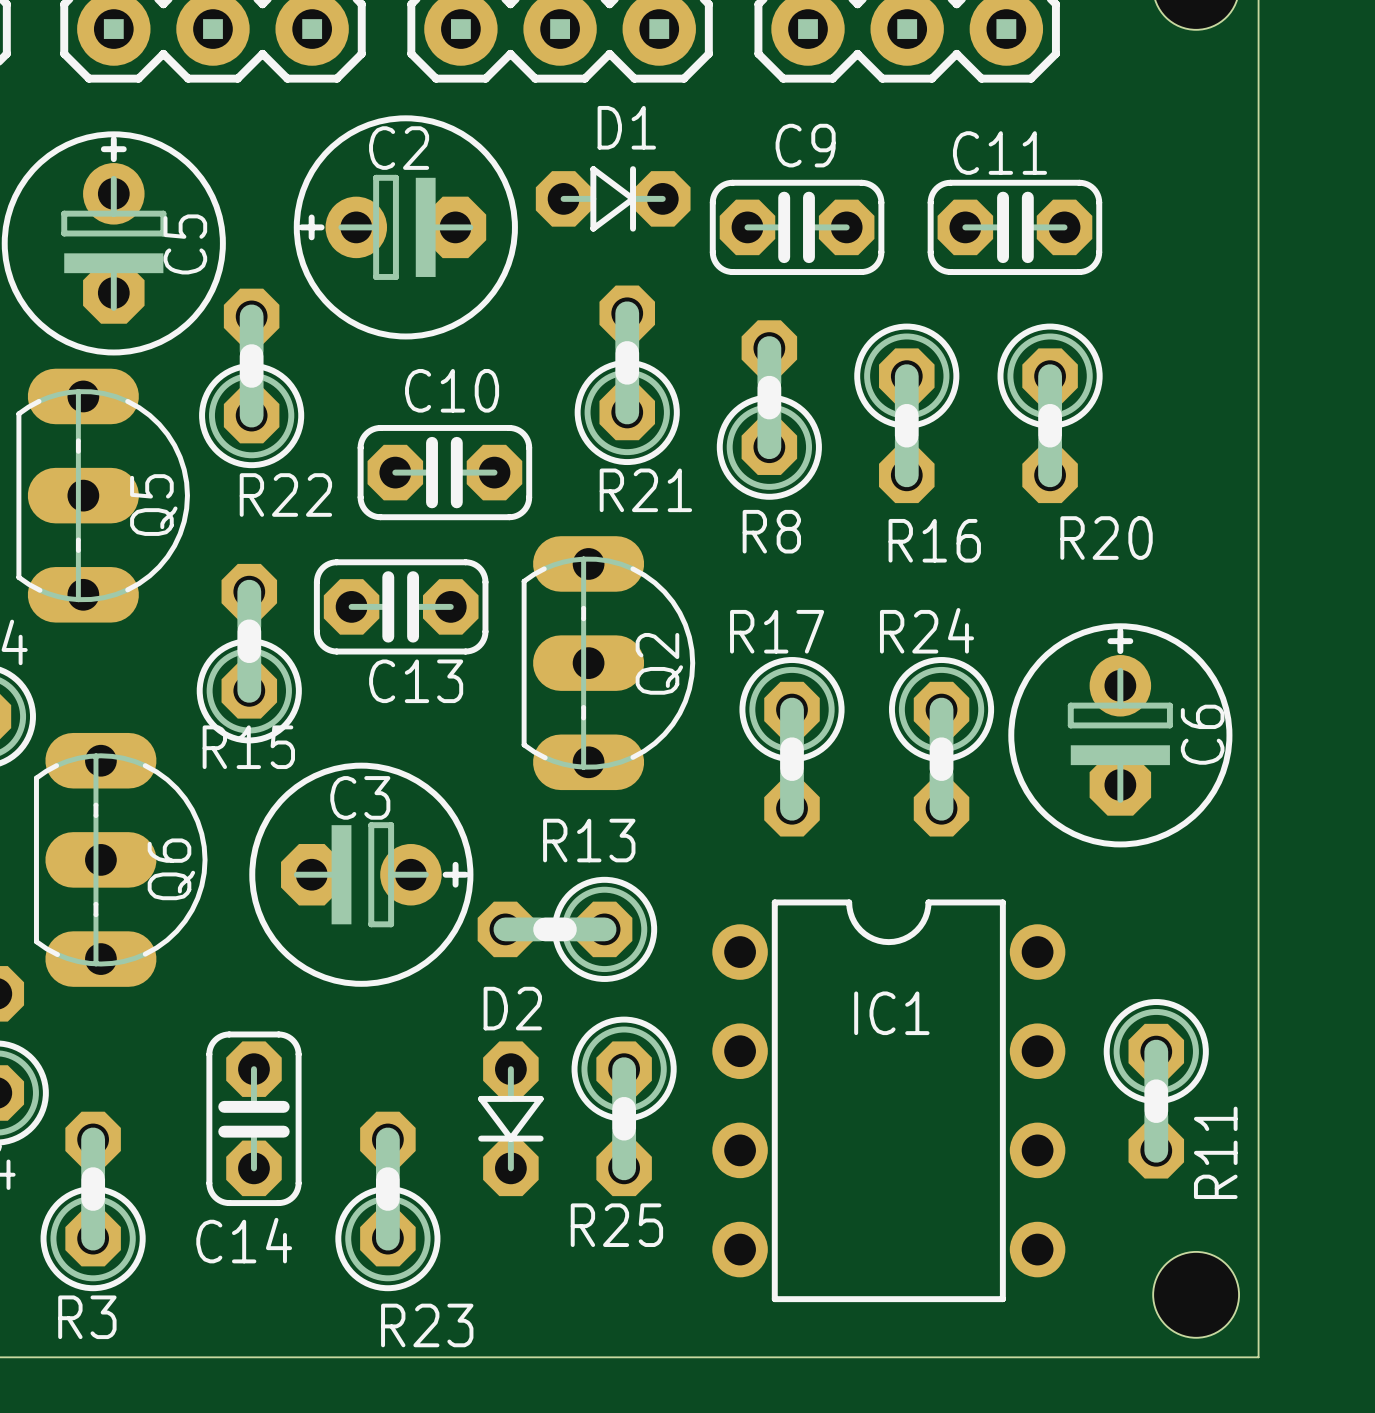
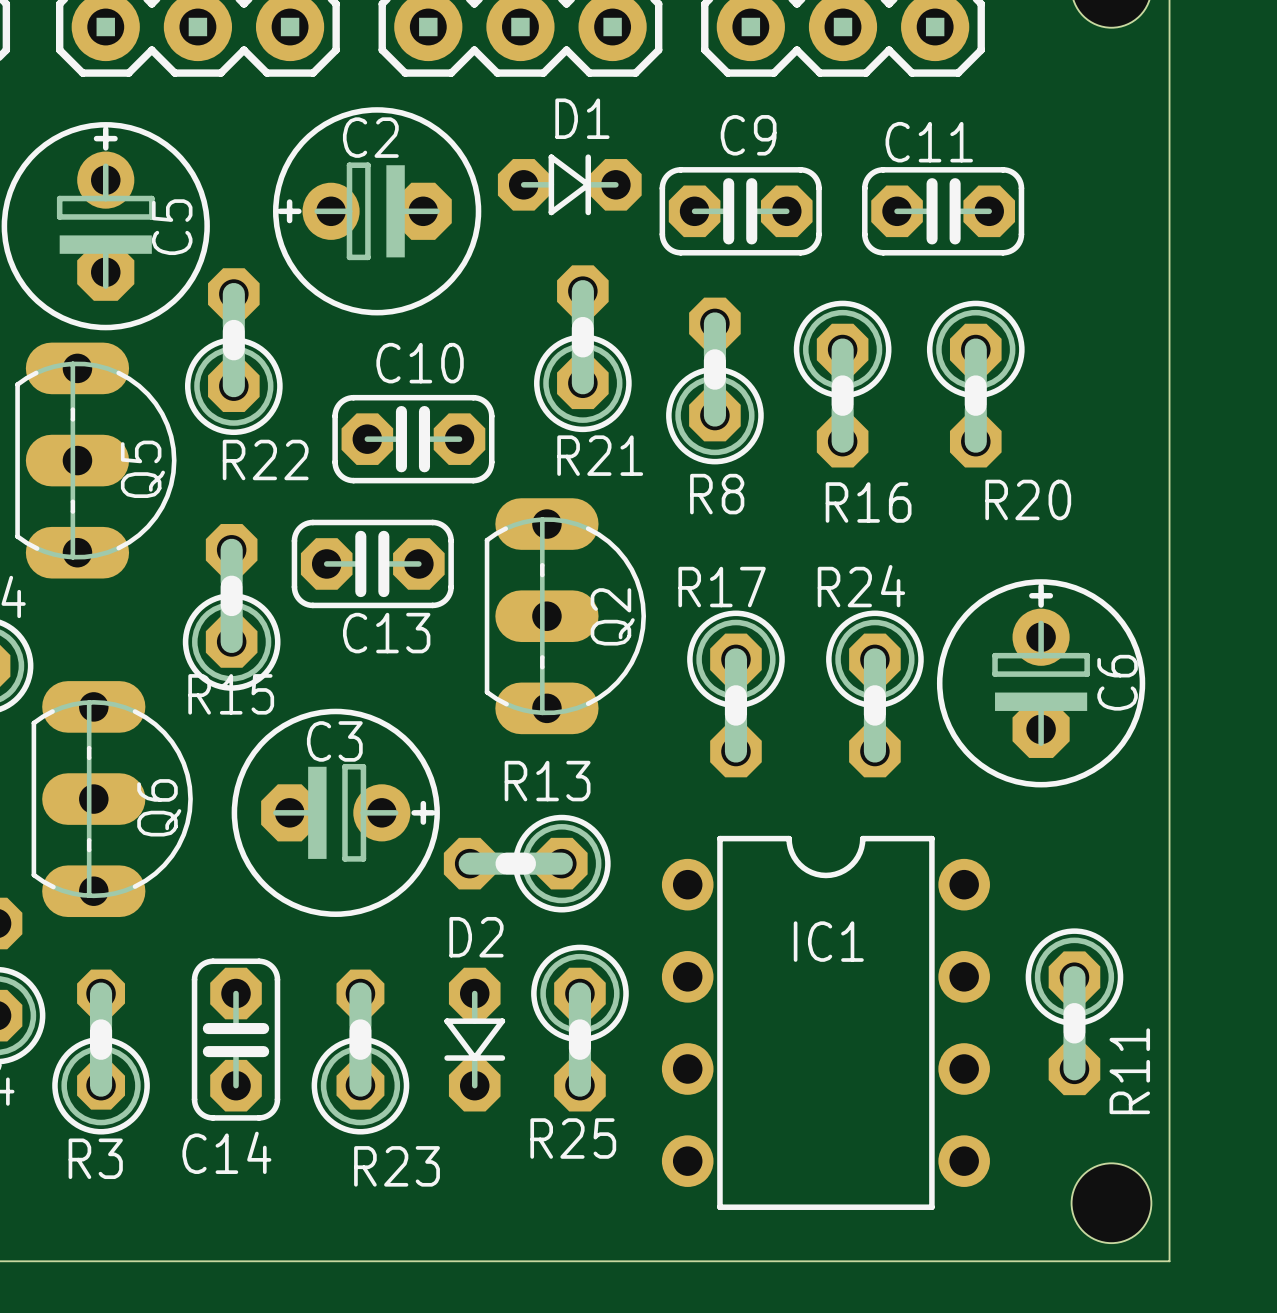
R3 footprint: [40, 1111, 146, 1292] -> [52, 969, 150, 1135]
R23 footprint: [335, 1111, 441, 1292] -> [311, 969, 410, 1135]

